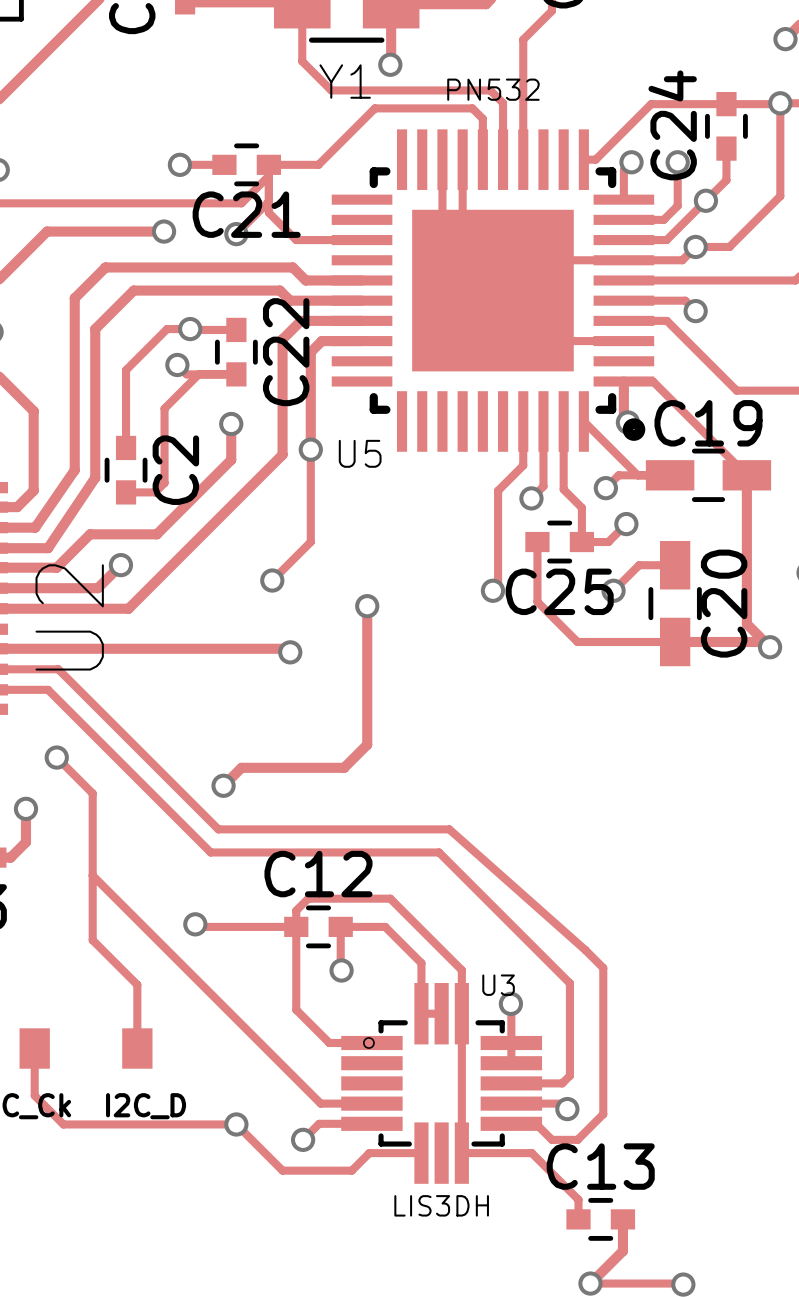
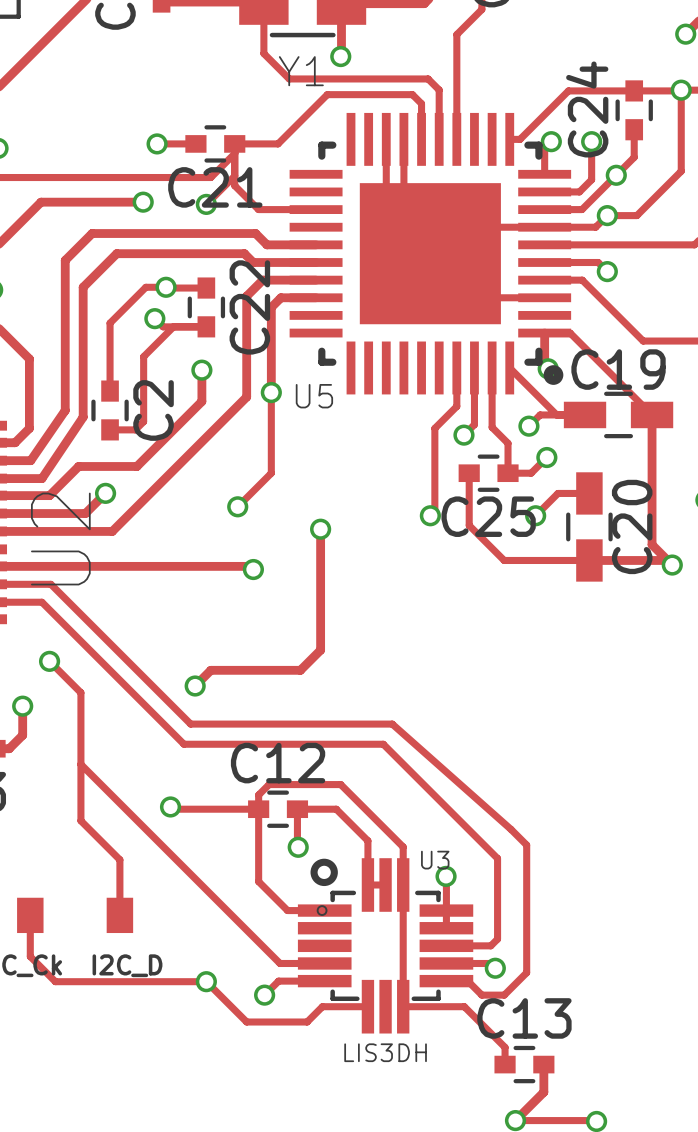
U5 value: PN532 (493, 89) -> none
U5 footprint: [331, 129, 655, 452] -> [289, 112, 572, 395]
drawing: none -> [310, 858, 338, 887]

